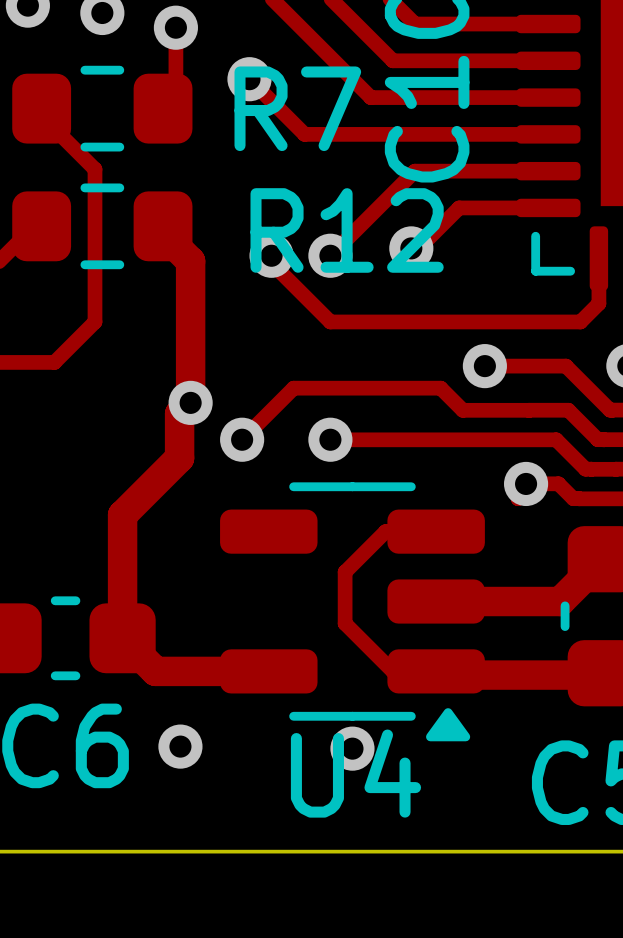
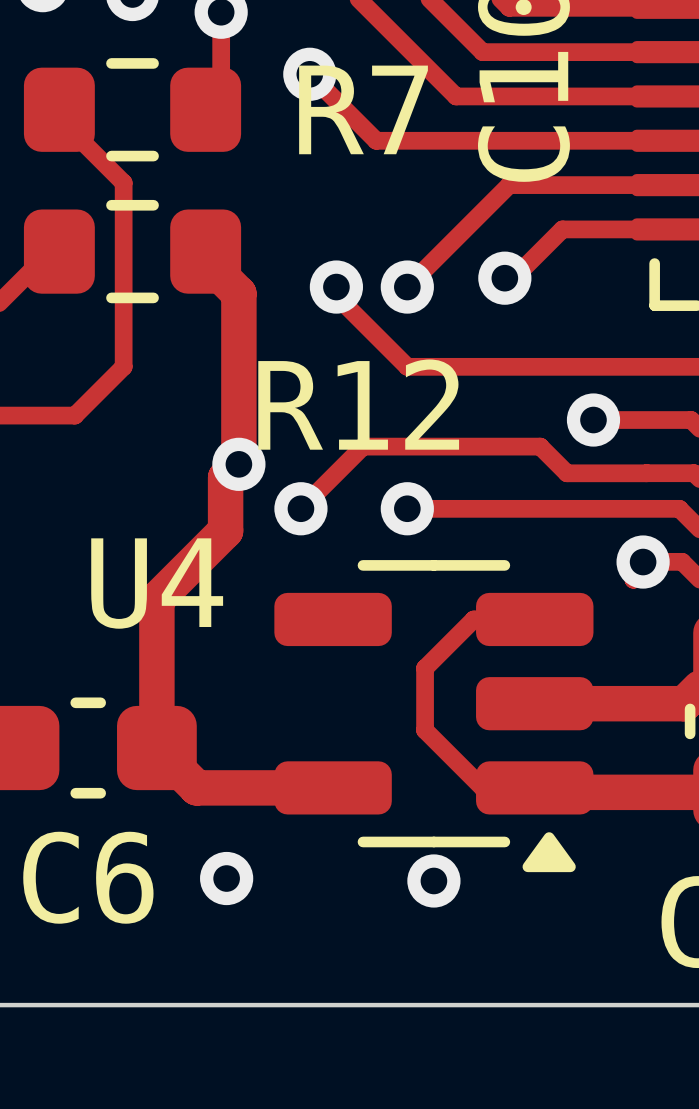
R12 name position: R12 (347, 230) -> R12 (358, 404)
U4 name position: U4 (355, 773) -> U4 (157, 583)

